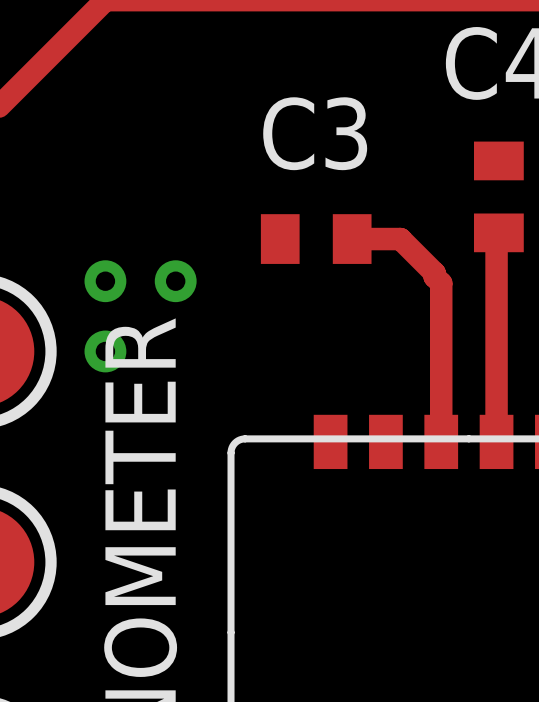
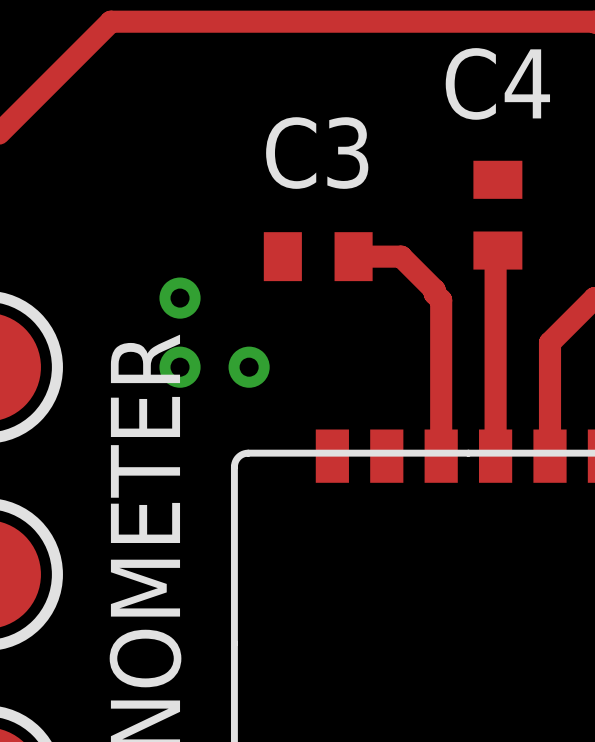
via: (105, 281) -> none
via: (105, 351) -> none
via: none -> (180, 367)
via: none -> (249, 367)

